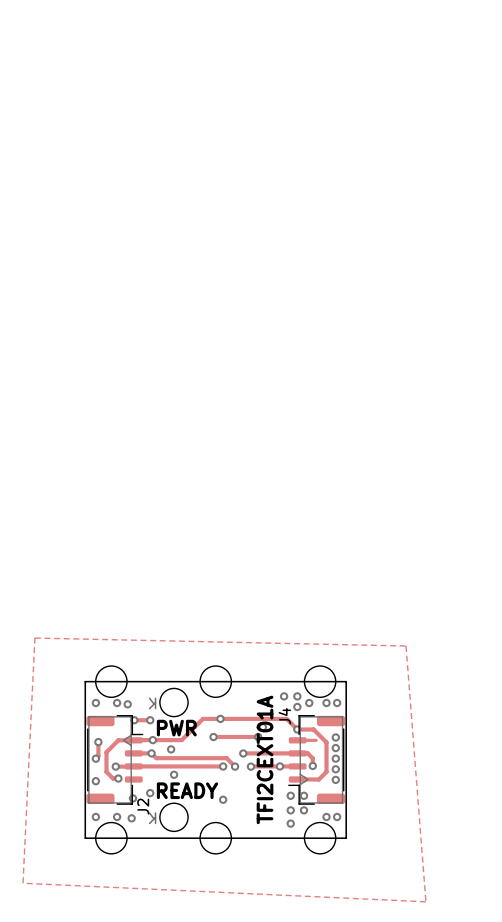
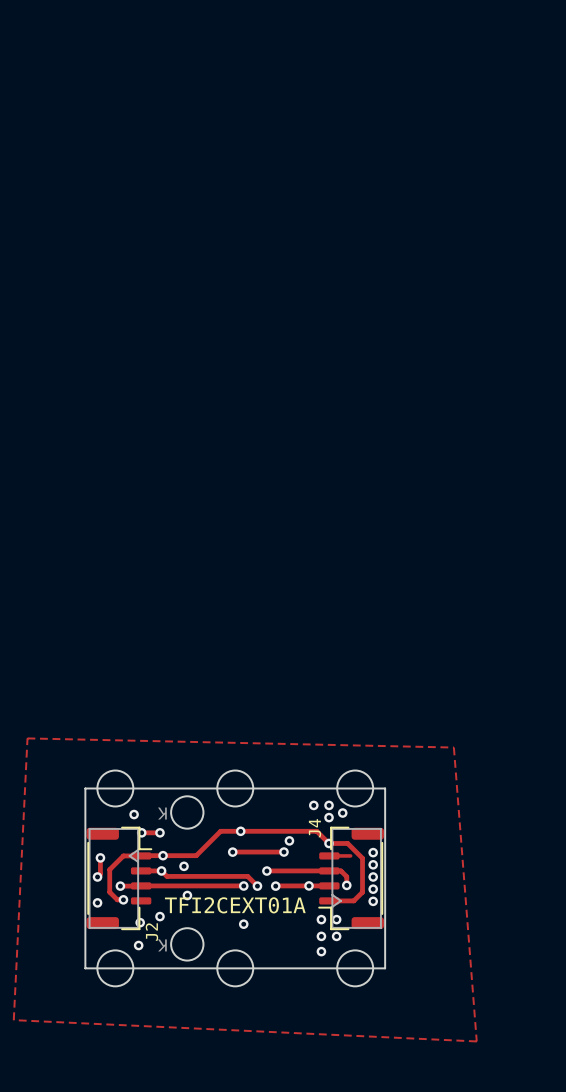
via: (95, 703) -> none
via: (117, 703) -> none
via: (326, 703) -> none
via: (337, 703) -> none
text: PWR (176, 728) -> none
text rotation: 0° (265, 759) -> 90° clockwise (235, 905)
text: READY (187, 790) -> none
via: (95, 816) -> none
via: (117, 816) -> none
via: (326, 816) -> none
via: (337, 816) -> none

